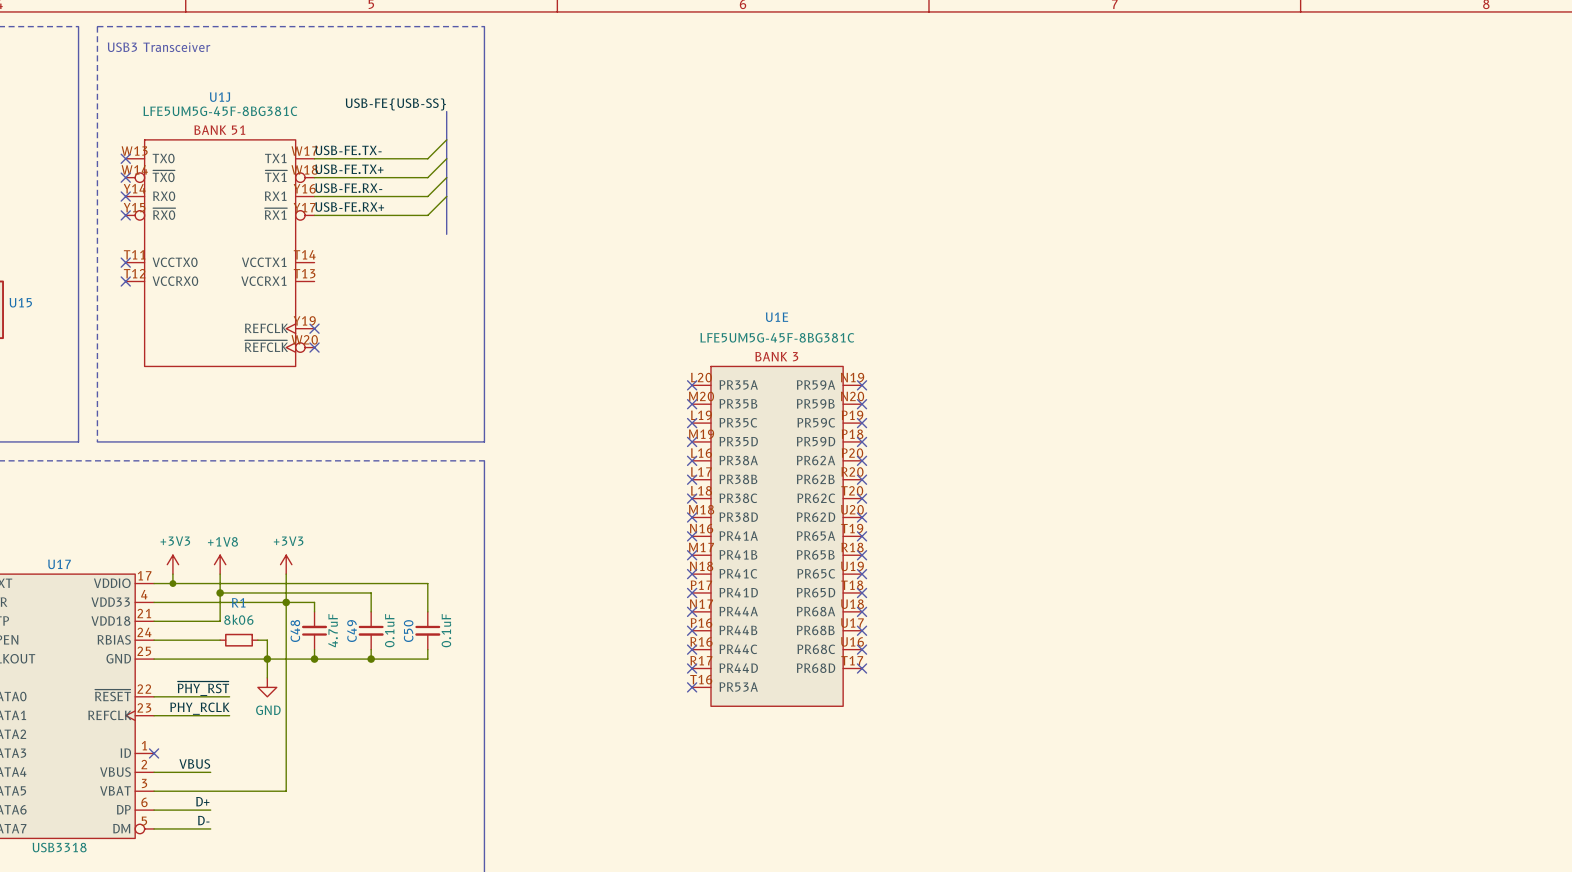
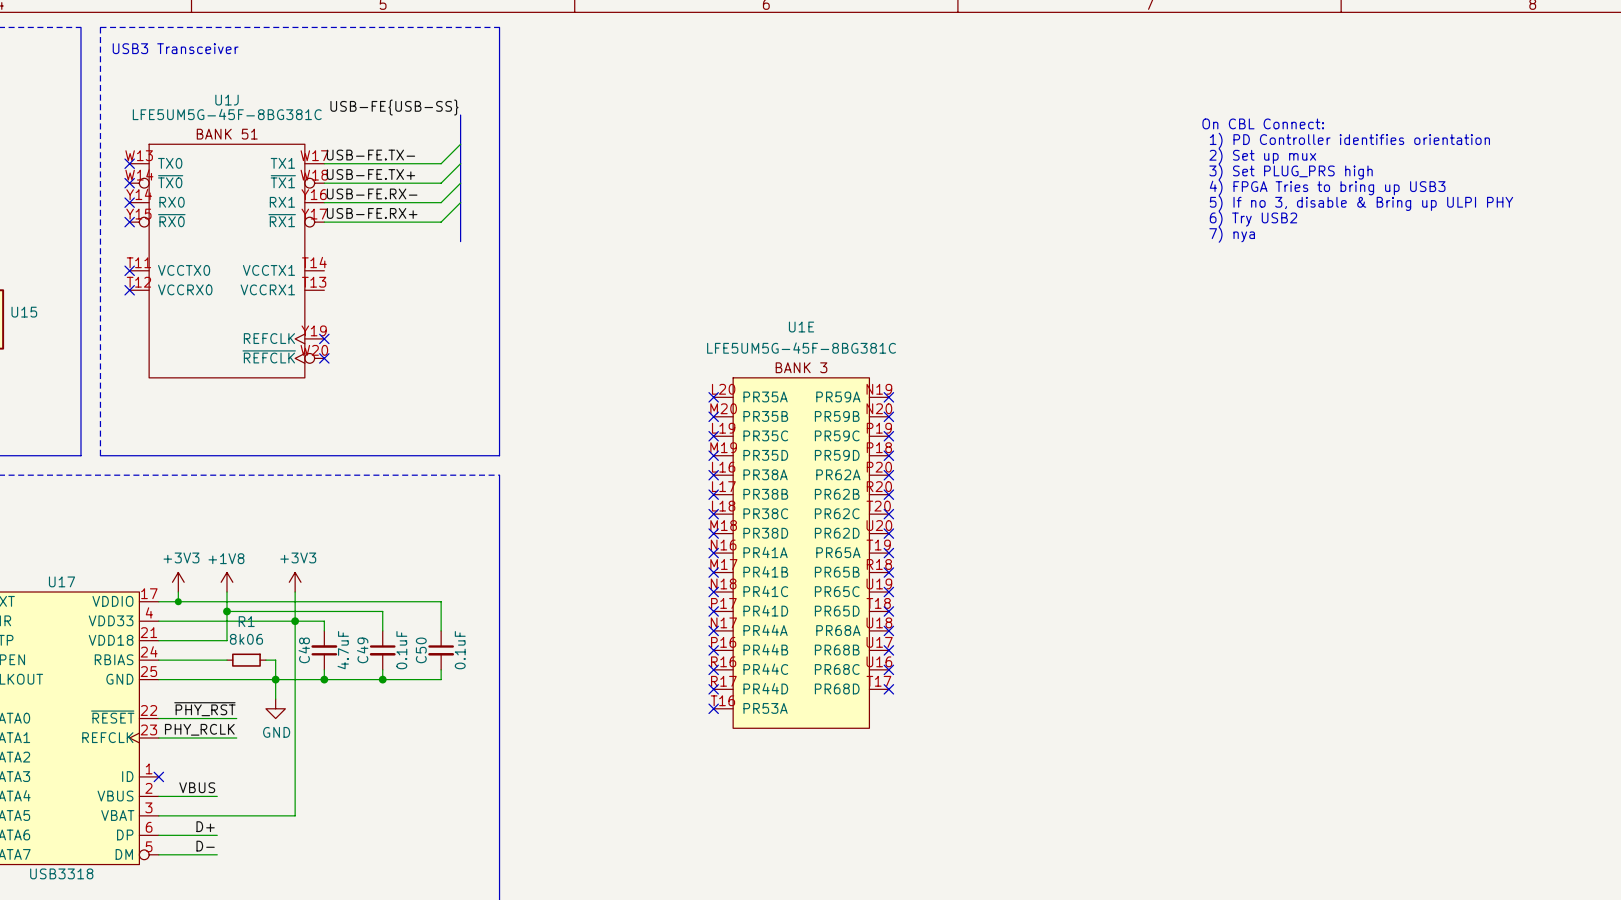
text: none -> On CBL Connect: (1263, 123)
text: none -> 1) PD Controller identifies orientation (1349, 140)
text: none -> 2) Set up mux (1262, 156)
text: none -> 3) Set PLUG_PRS high (1291, 172)
text: none -> 4) FPGA Tries to bring up USB3 (1327, 187)
text: none -> 5) If no 3, disable & Bring up ULPI PHY (1361, 203)
text: none -> 6) Try USB2 (1253, 219)
text: none -> 7) nya (1232, 234)

